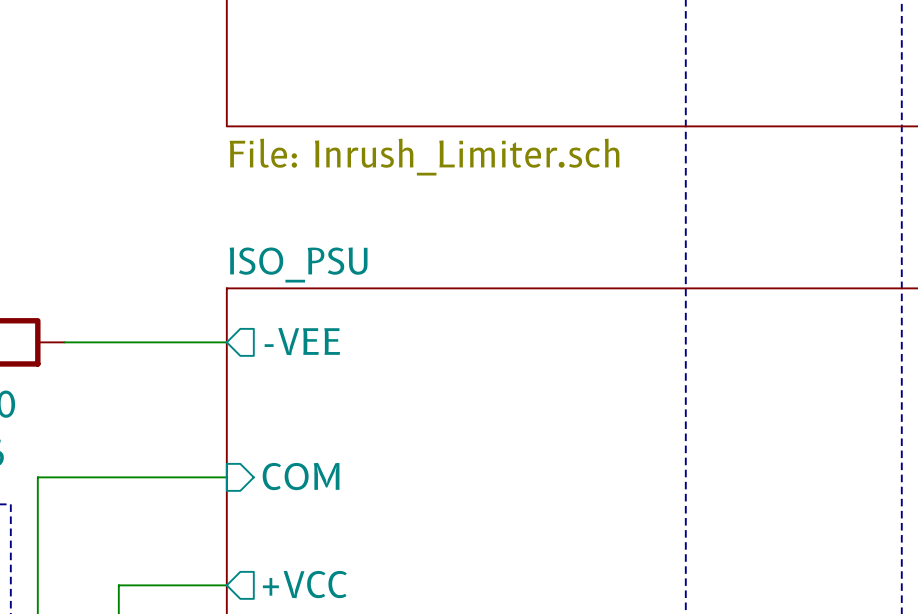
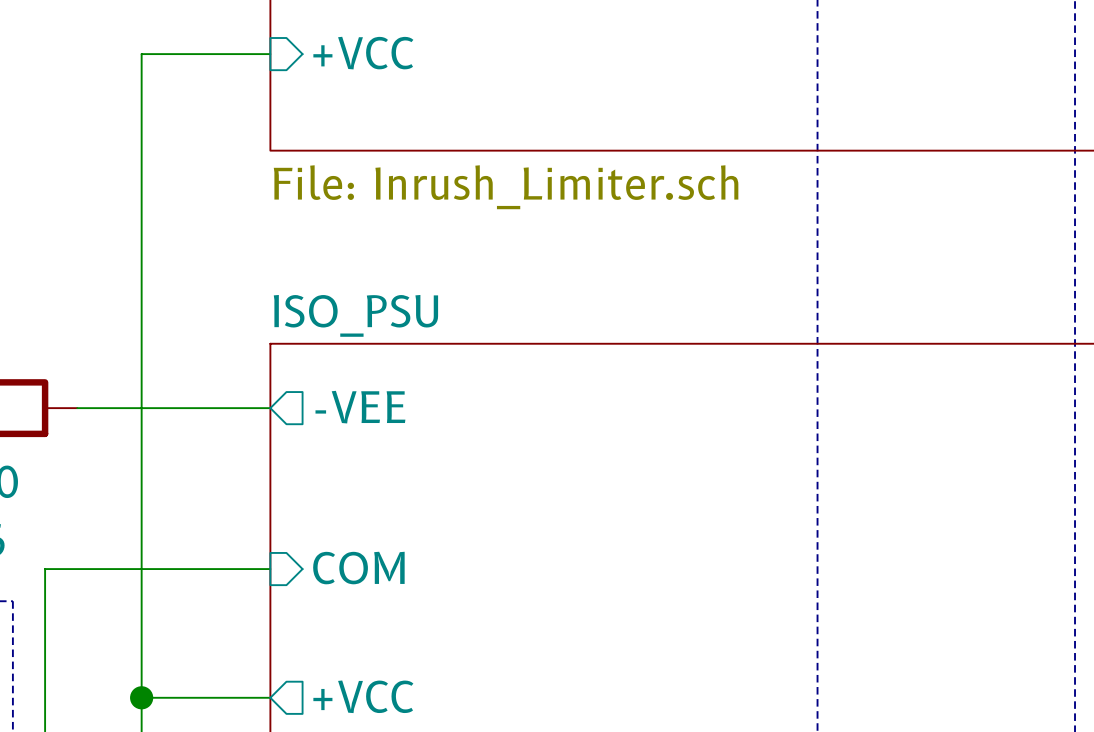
sheet pin: none -> +VCC (363, 53)
wire: none -> (270, 54) (141, 54) (141, 697)
junction: none -> (141, 697)

